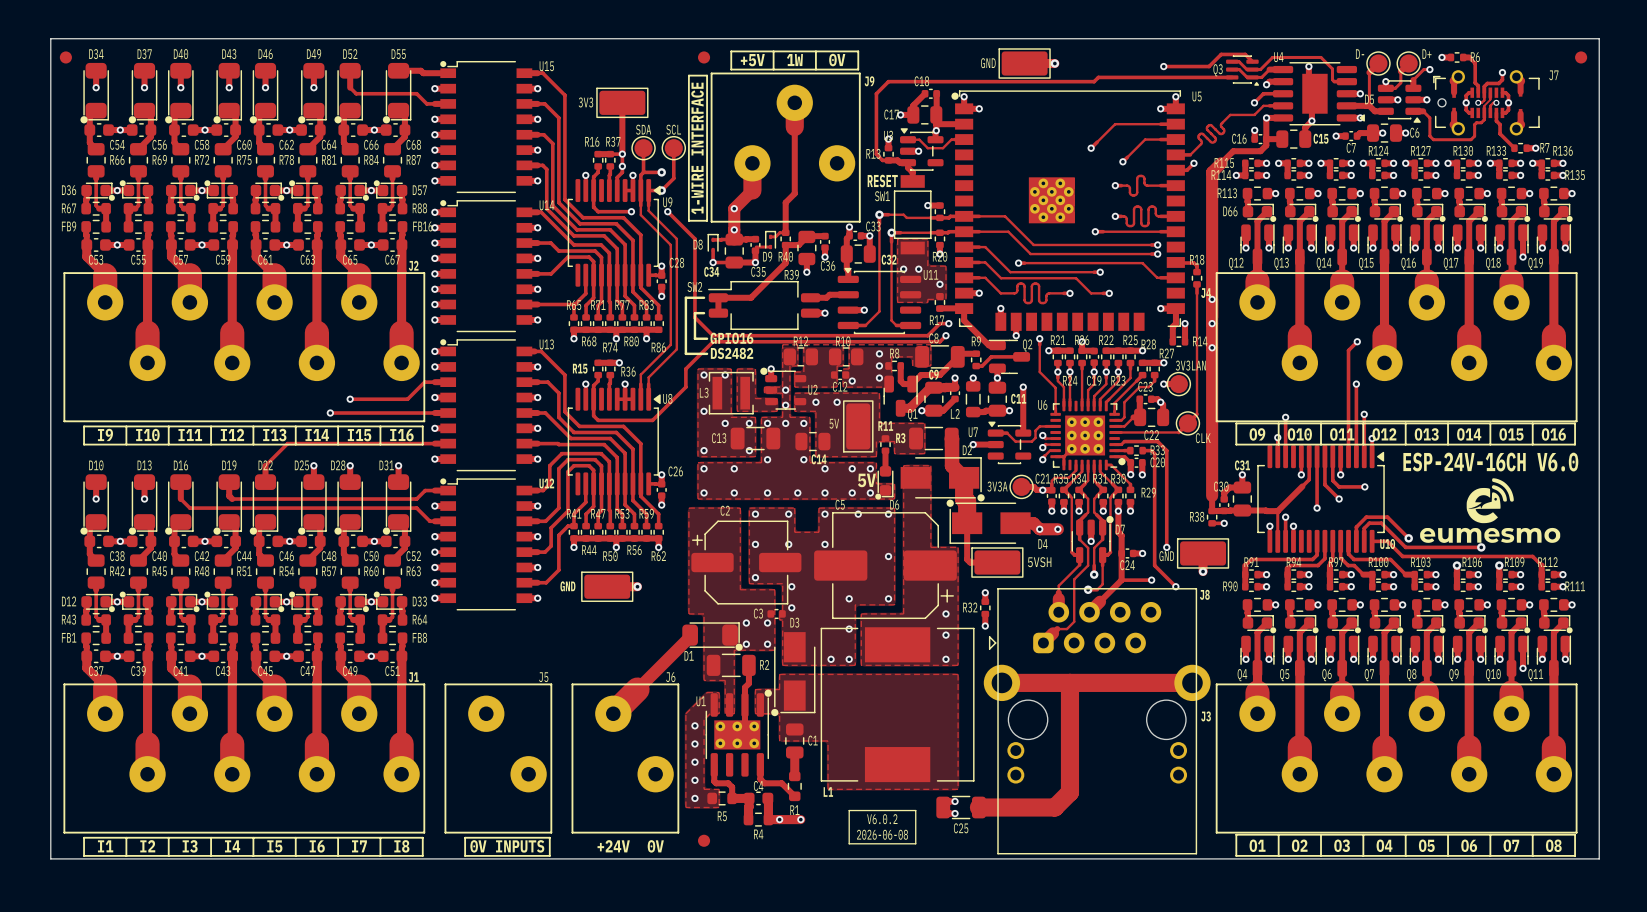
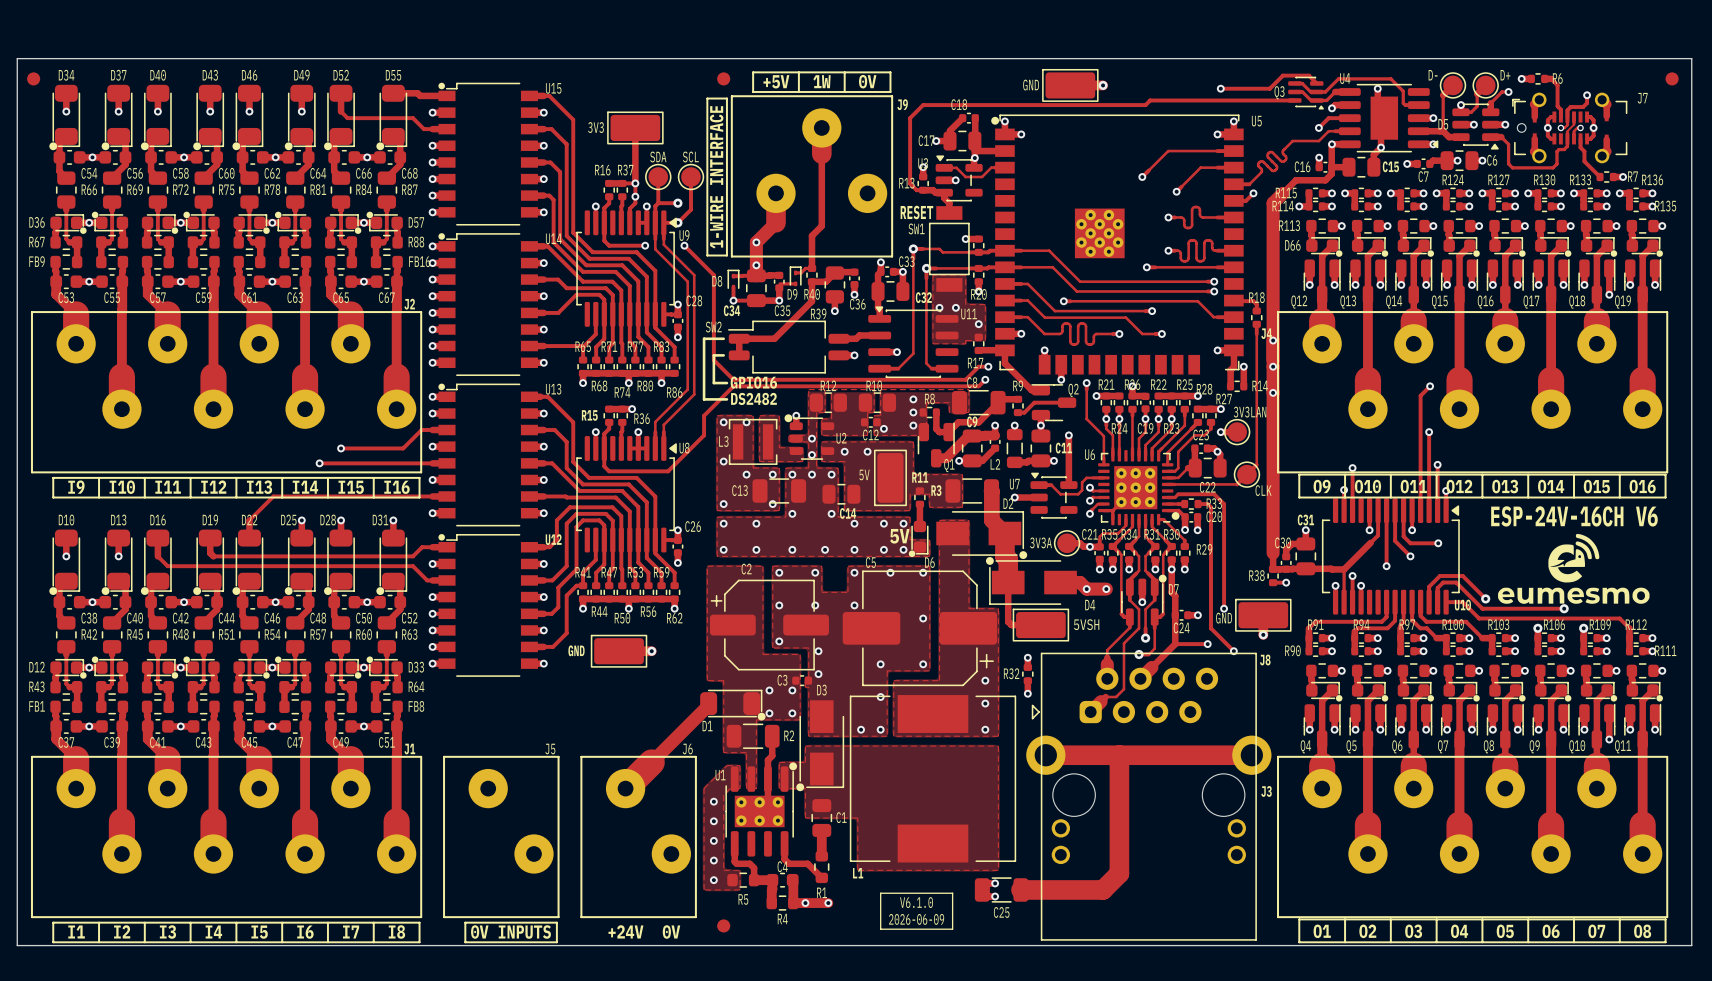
text: ESP-24V-16CH V6.0 (1490, 462) -> ESP-24V-16CH V6 (1574, 516)
text: V6.0.2 (882, 819) -> V6.1.0 (916, 902)
text: 2026-06-08 (882, 834) -> 2026-06-09 (916, 919)

